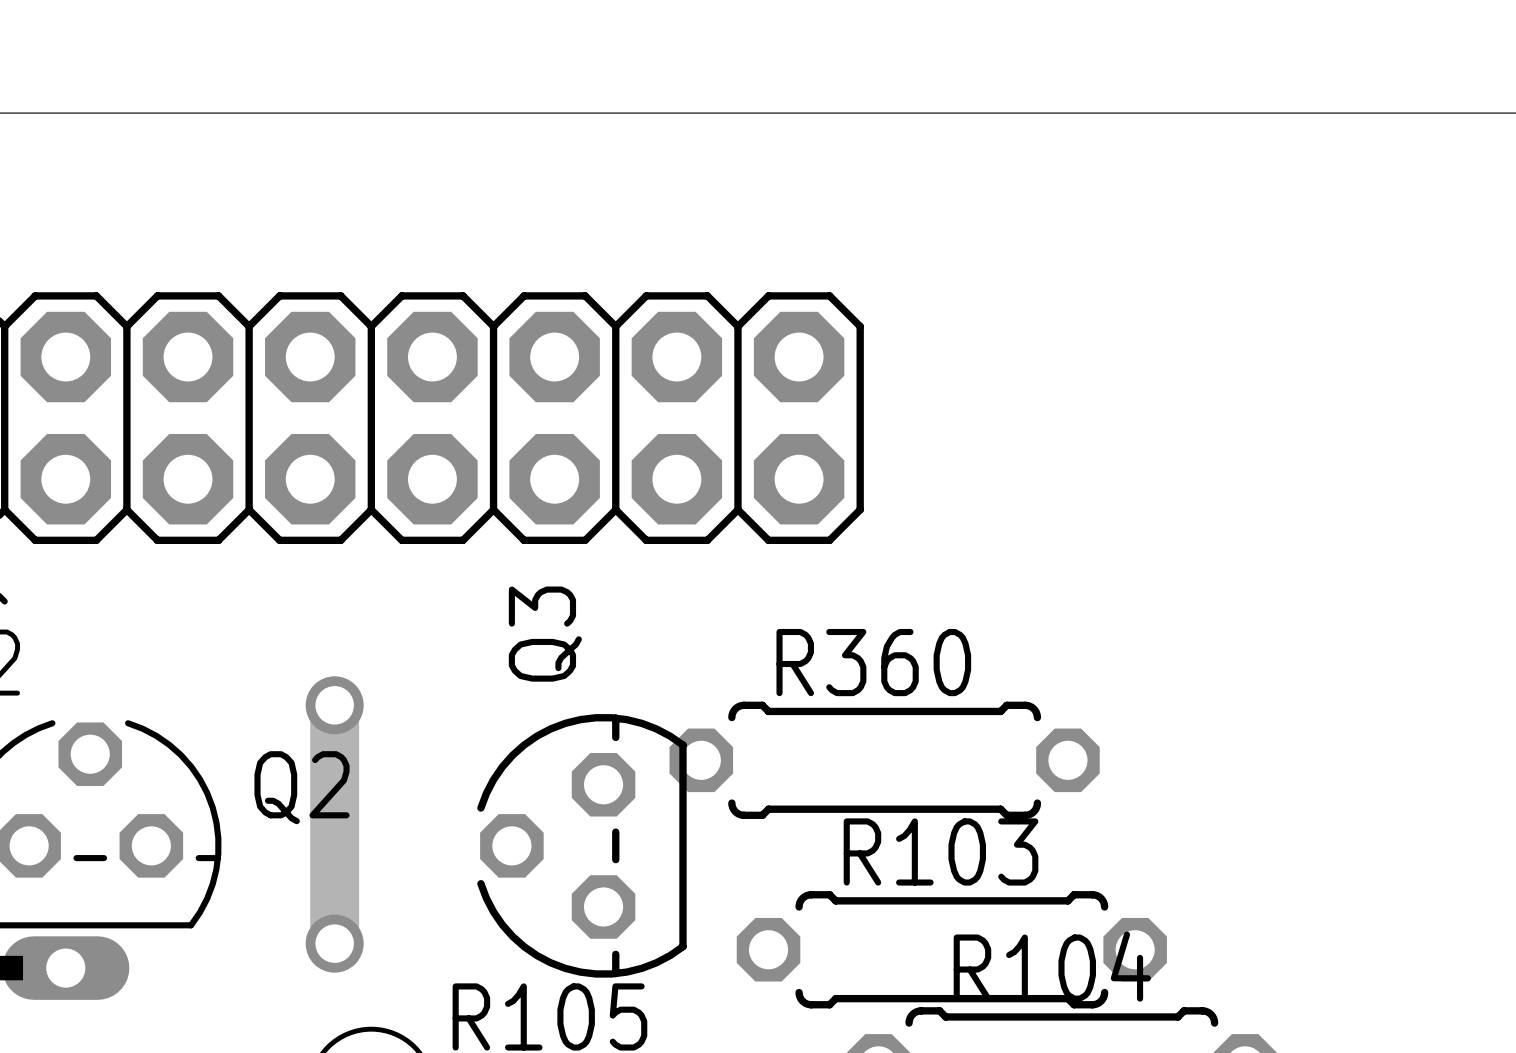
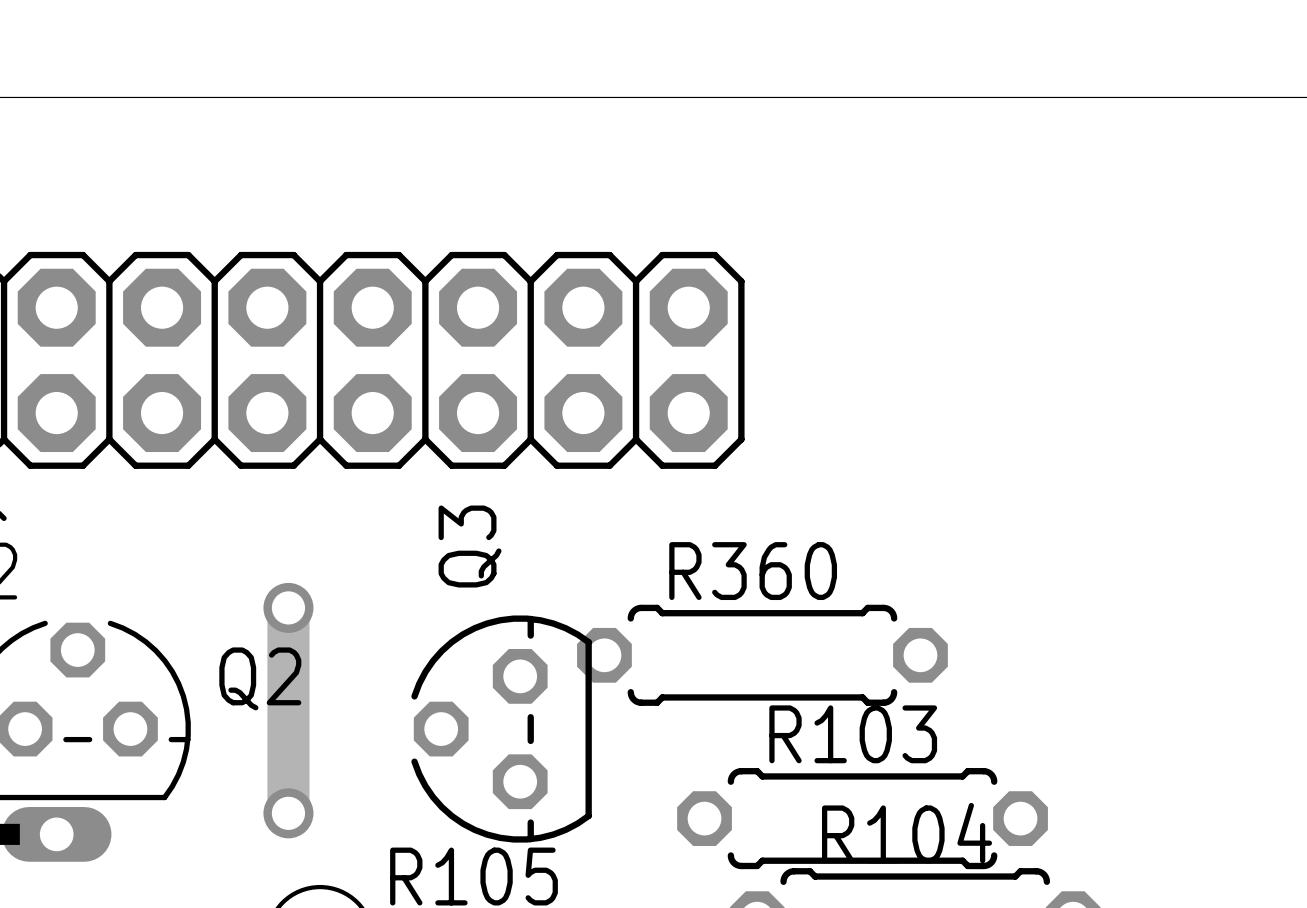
R103 position: (951, 949) -> (862, 818)

